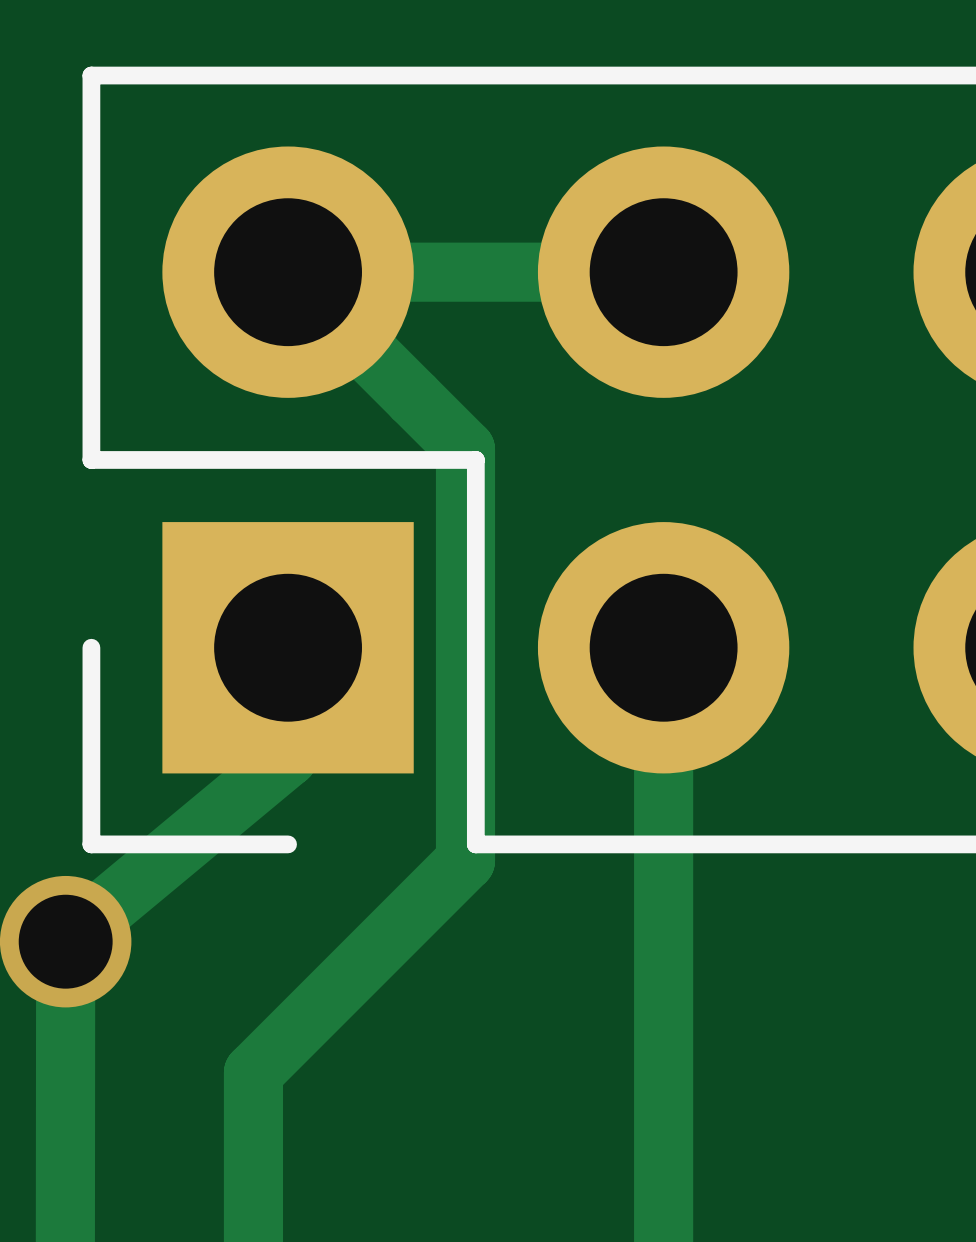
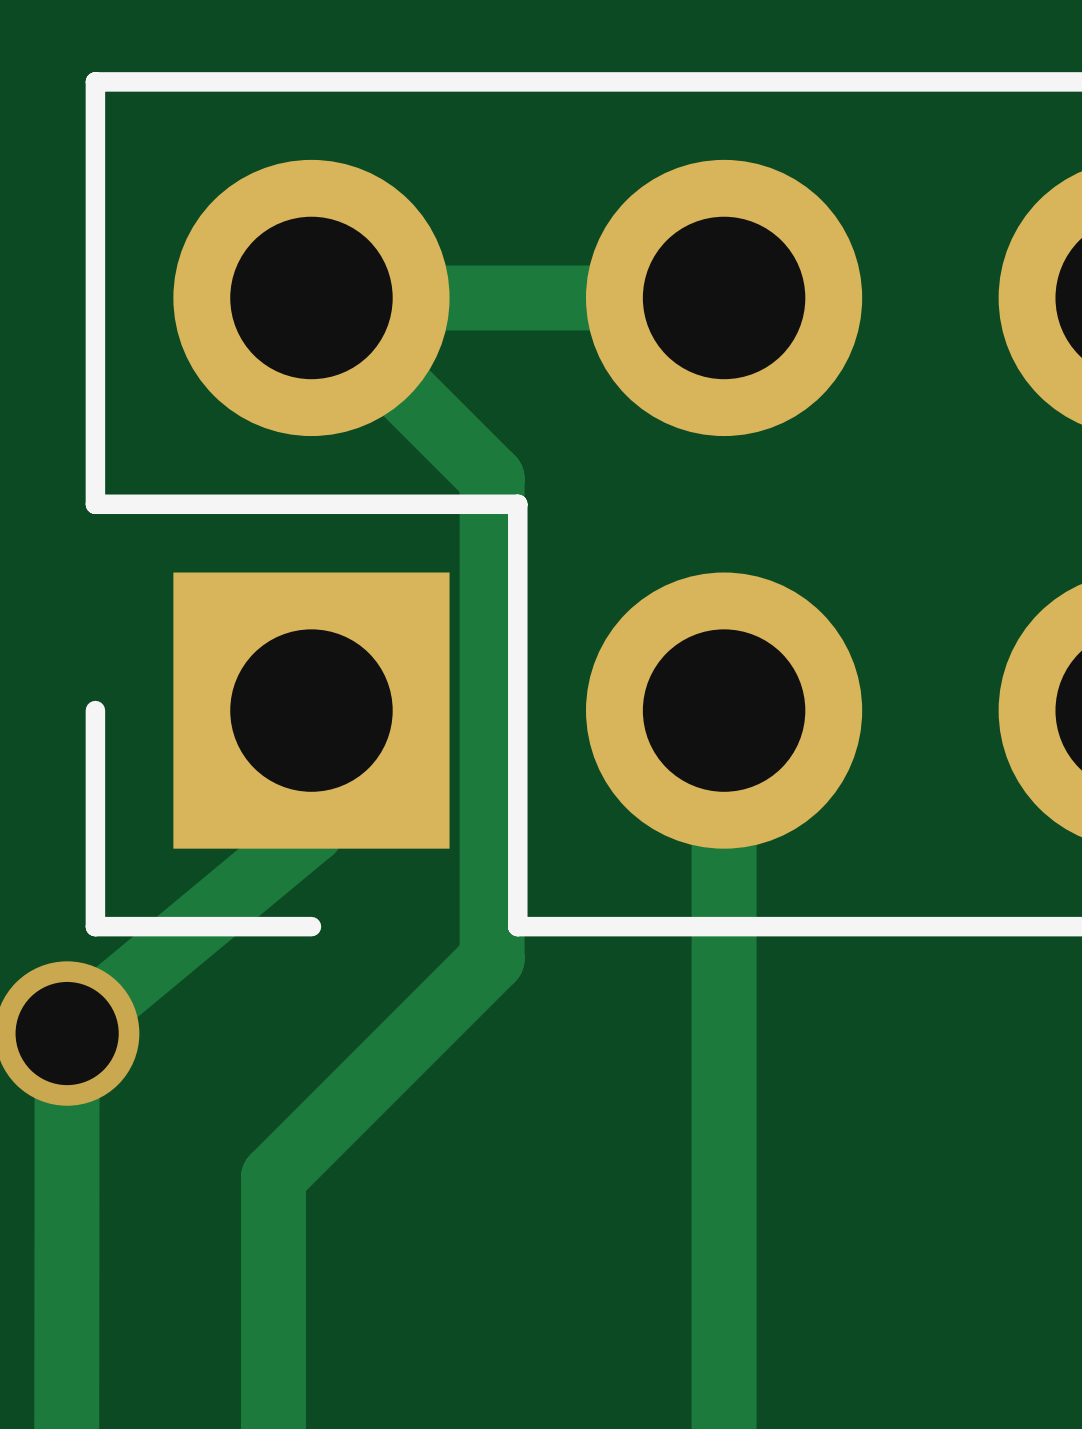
track: (452, 436) (465, 449) (465, 860) (452, 873) -> (492, 478) (492, 958)

